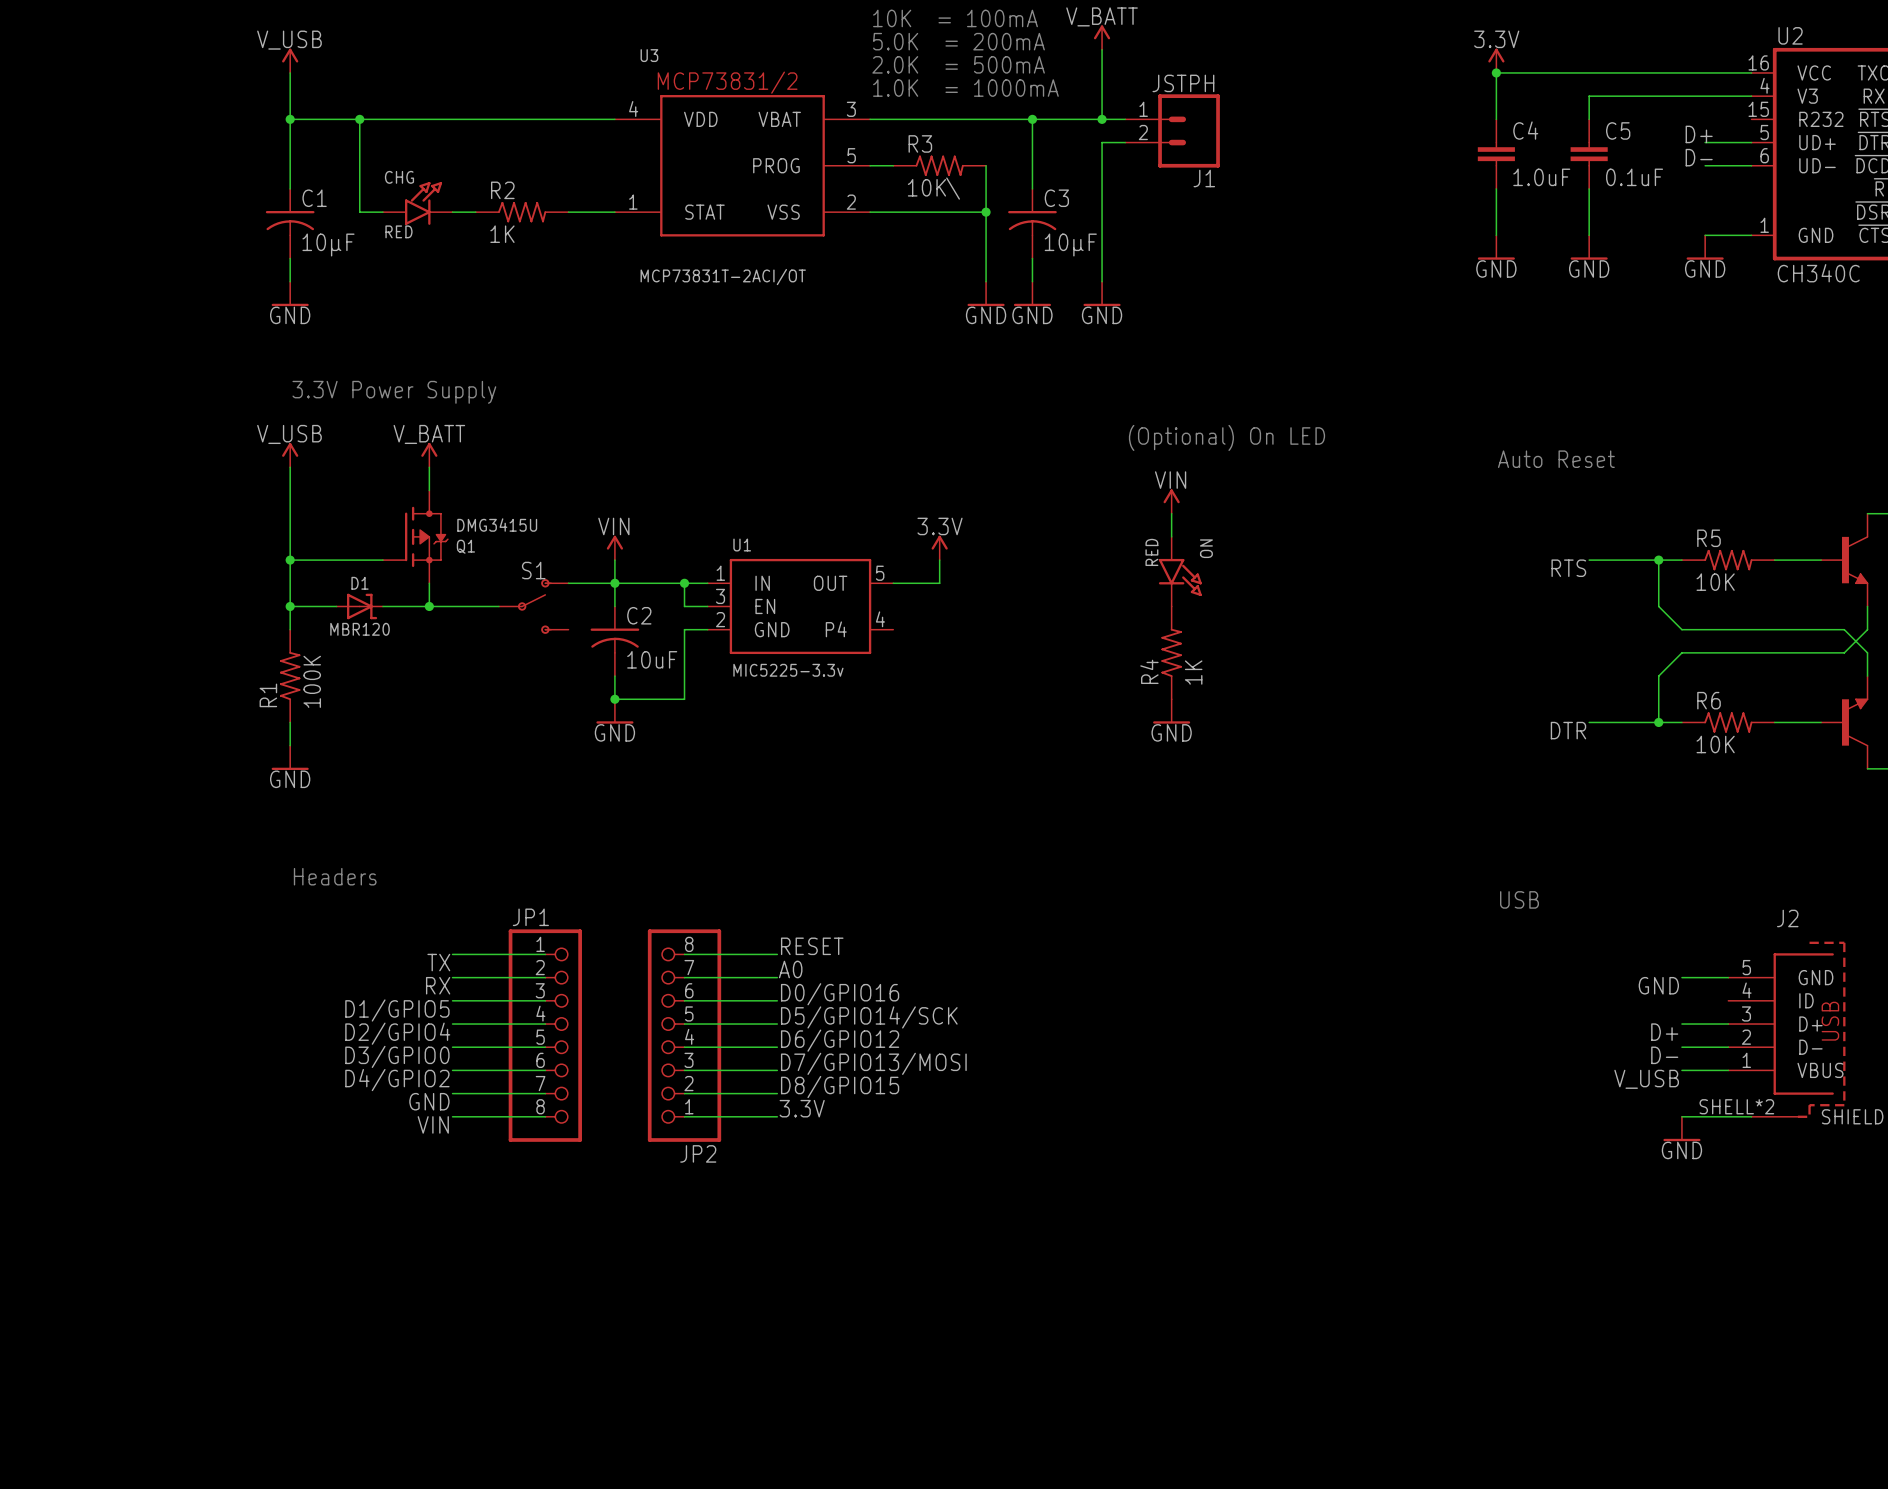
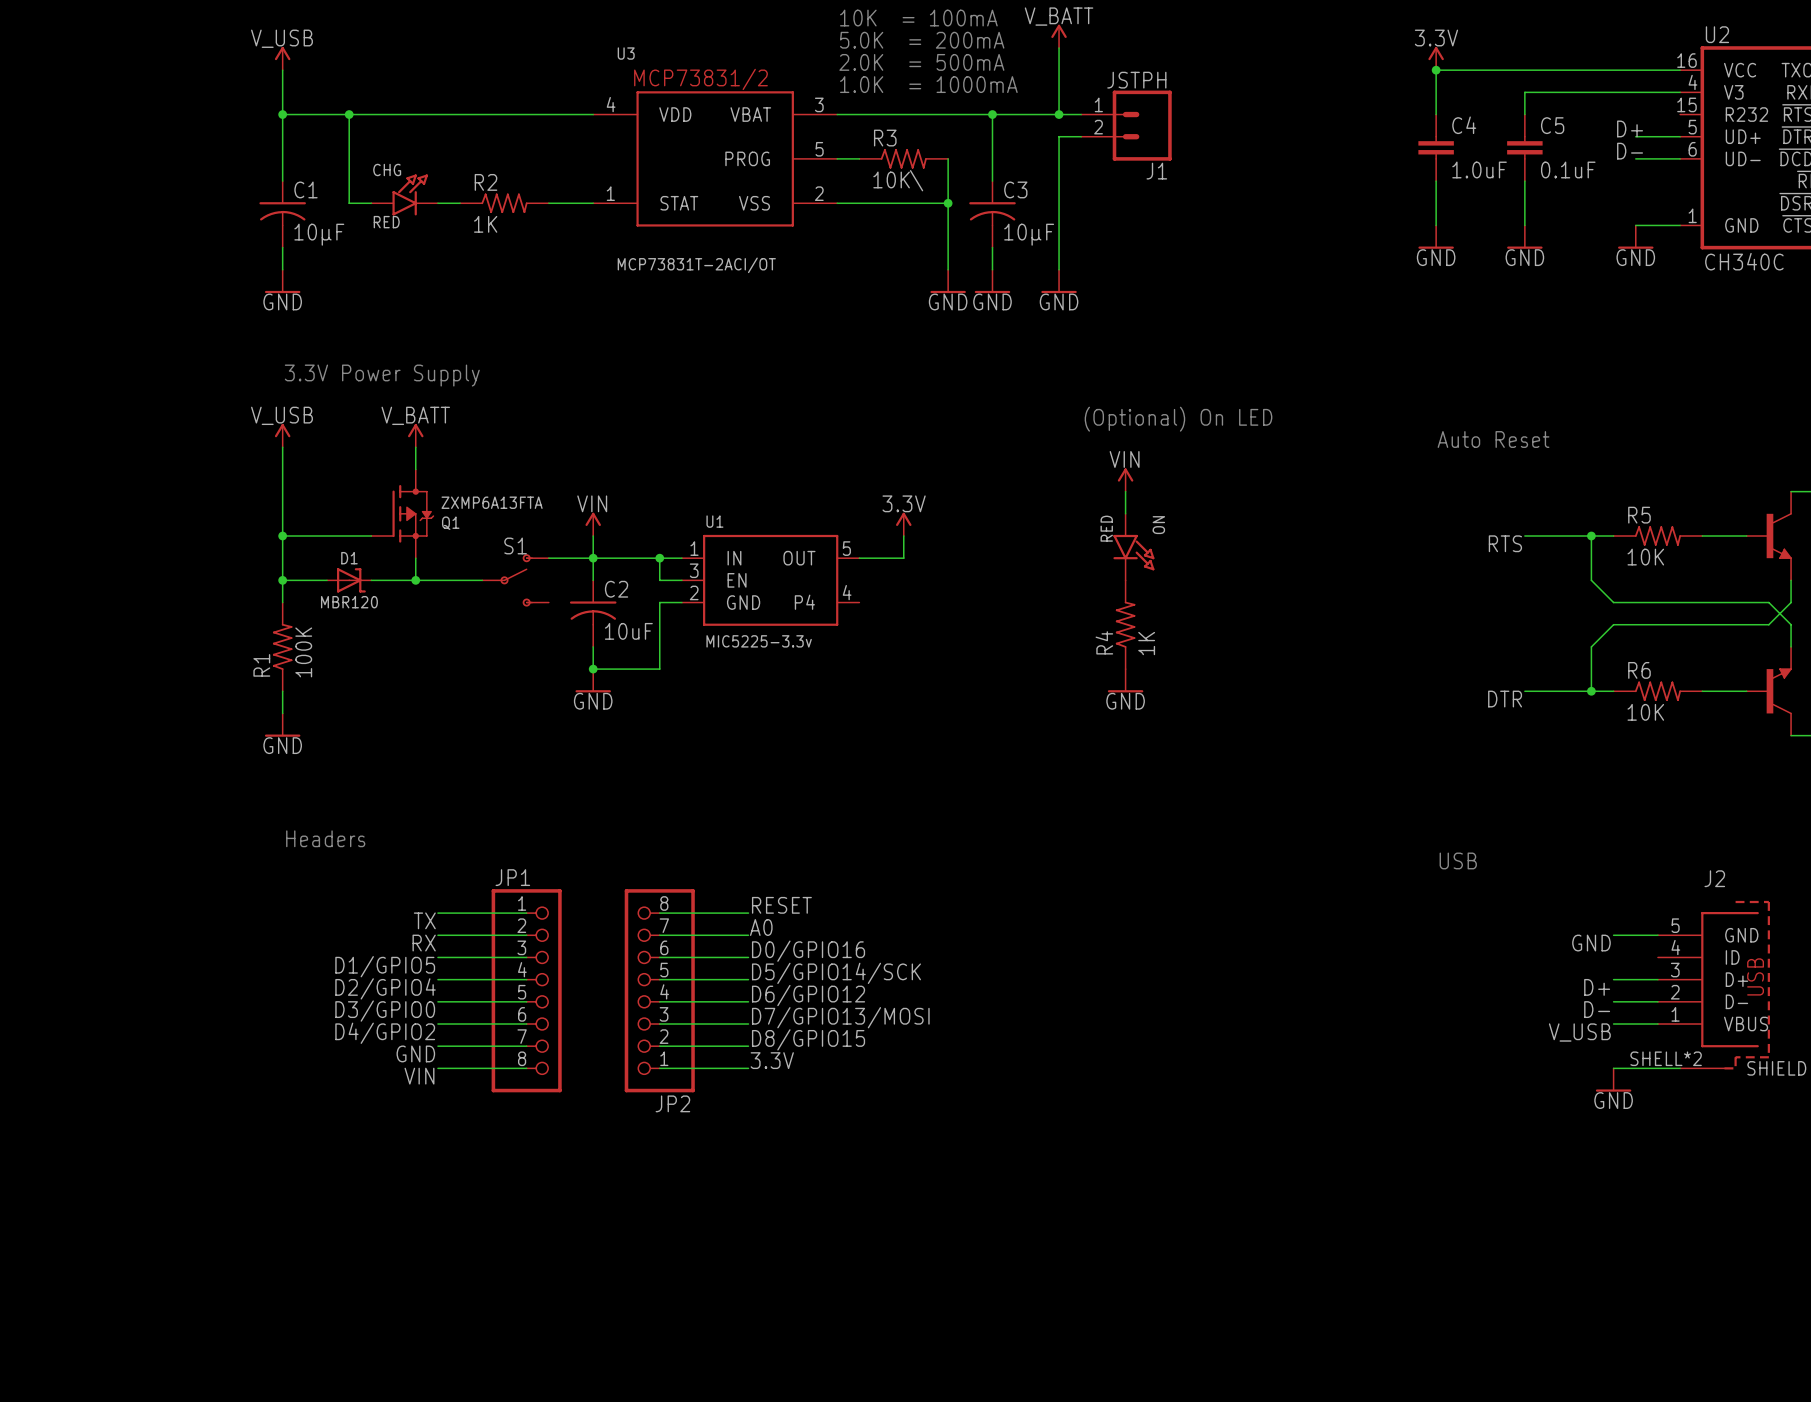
Q1 value: DMG3415U (497, 525) -> ZXMP6A13FTA (492, 502)

